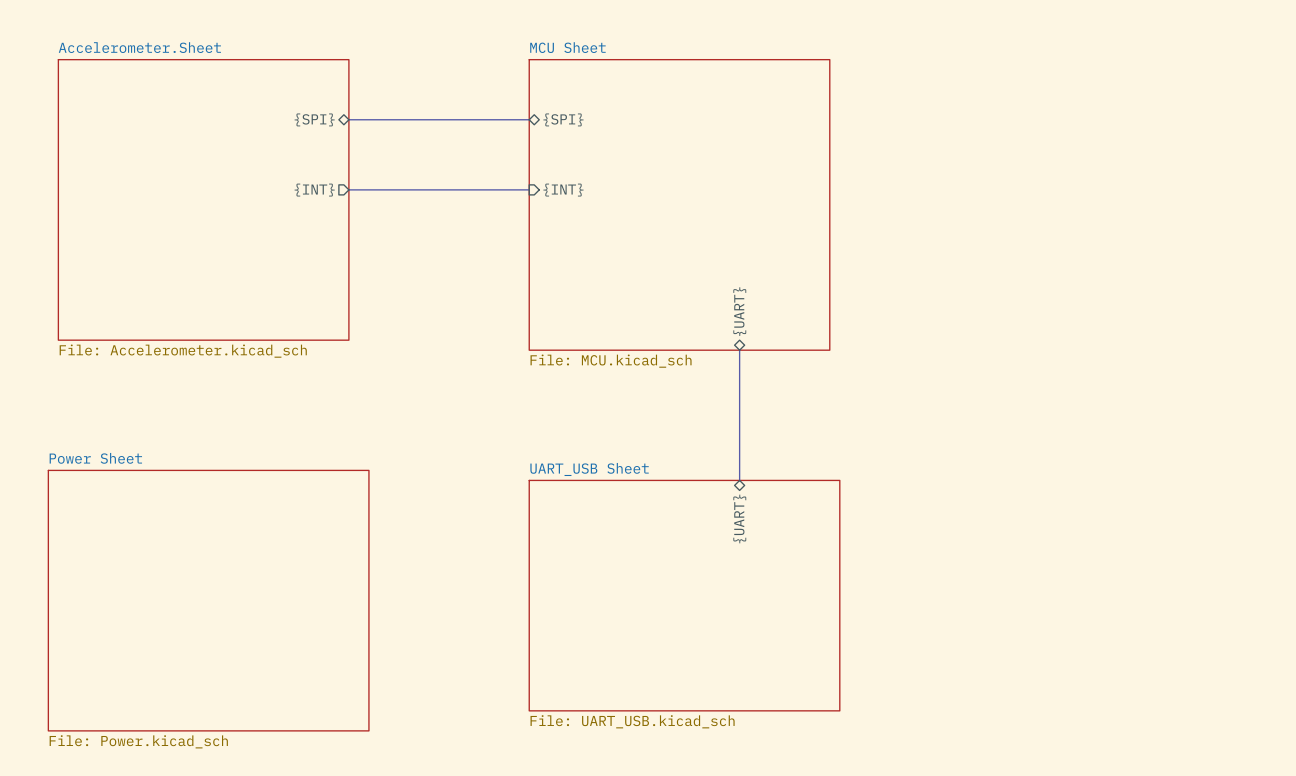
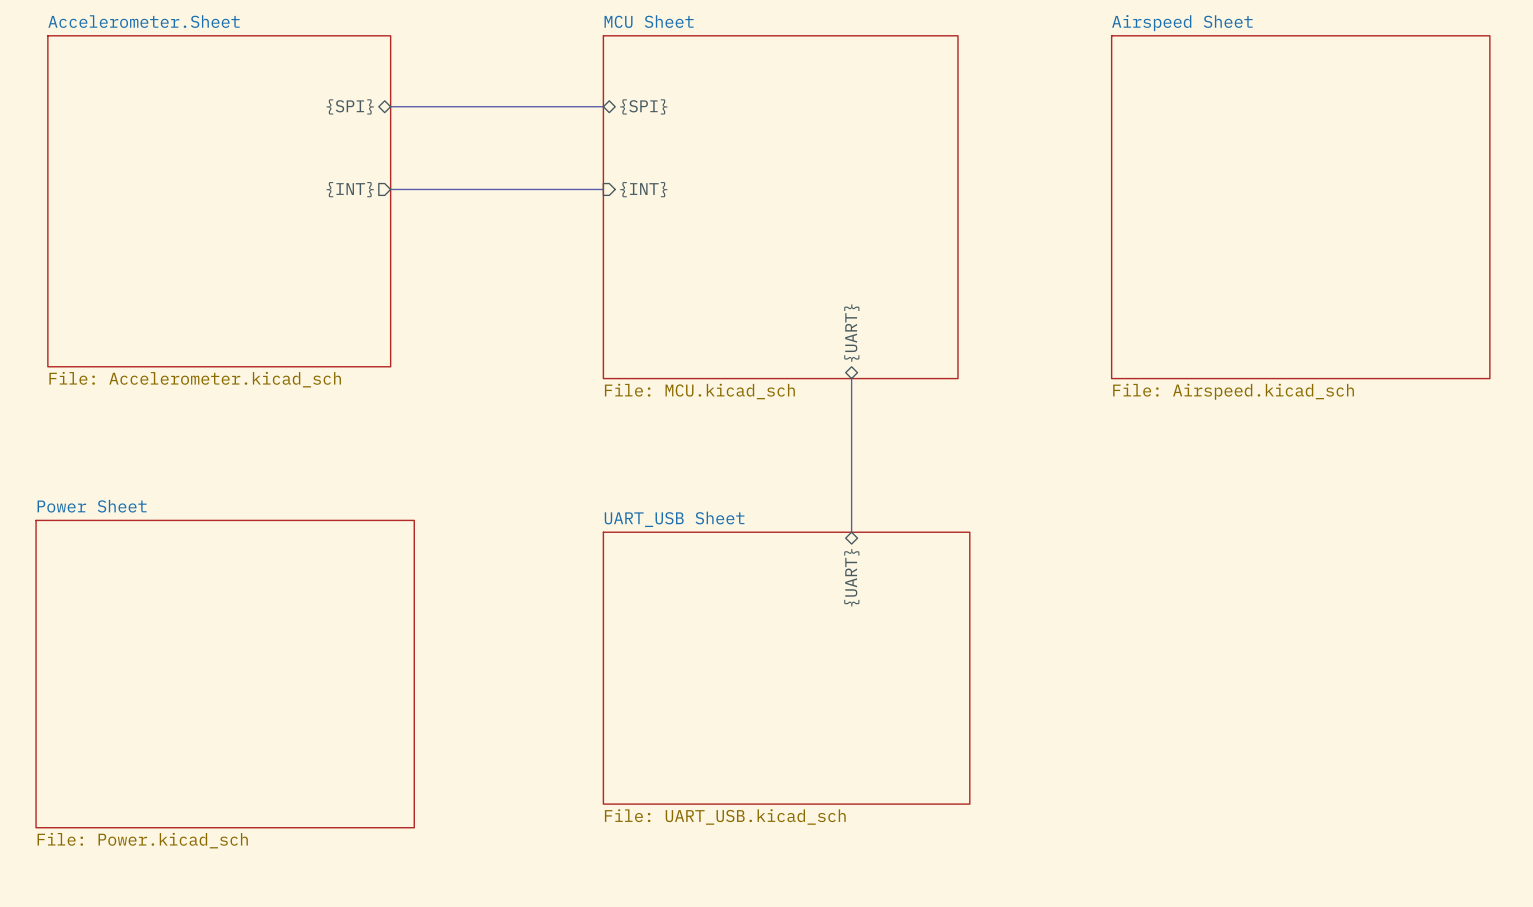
sheet Airspeed Sheet: none -> File: Airspeed.kicad_sch (1300, 207)

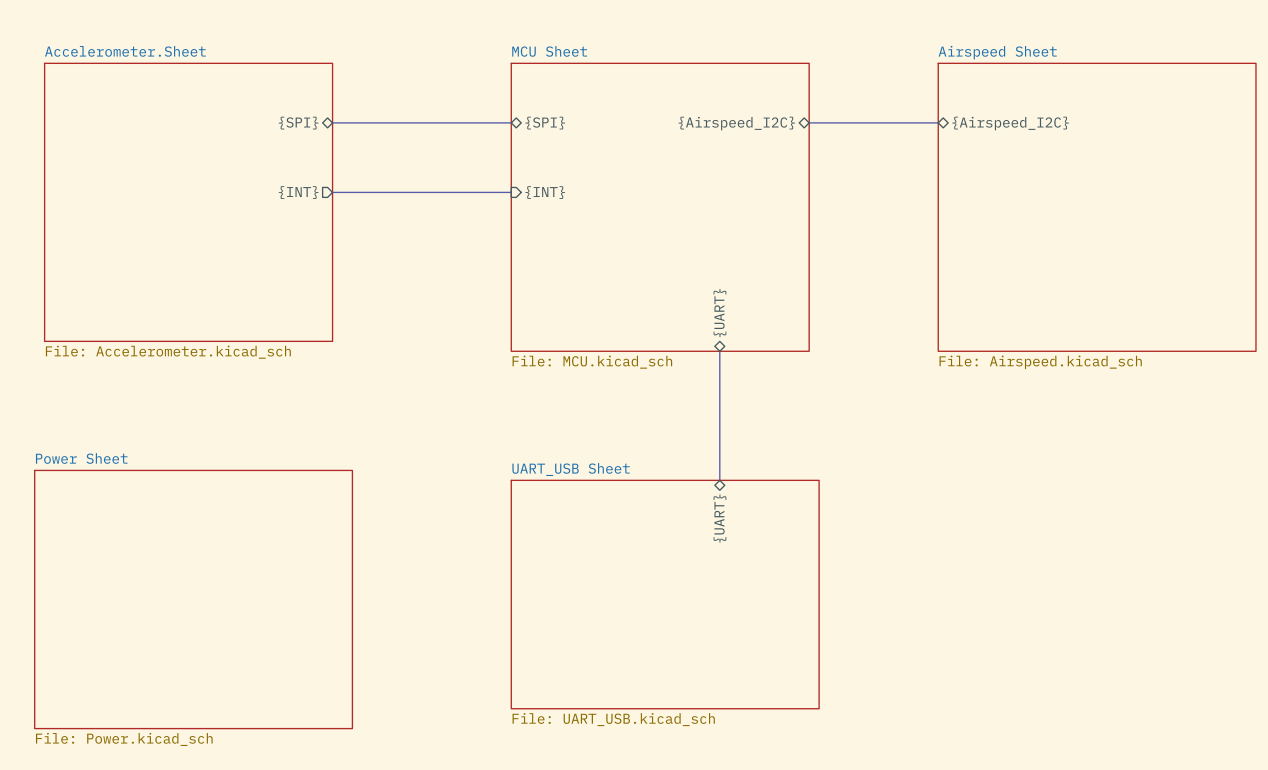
bus: none -> (809, 122) (938, 122)
sheet pin: none -> {Airspeed_I2C} (736, 123)
sheet pin: none -> {Airspeed_I2C} (1010, 123)

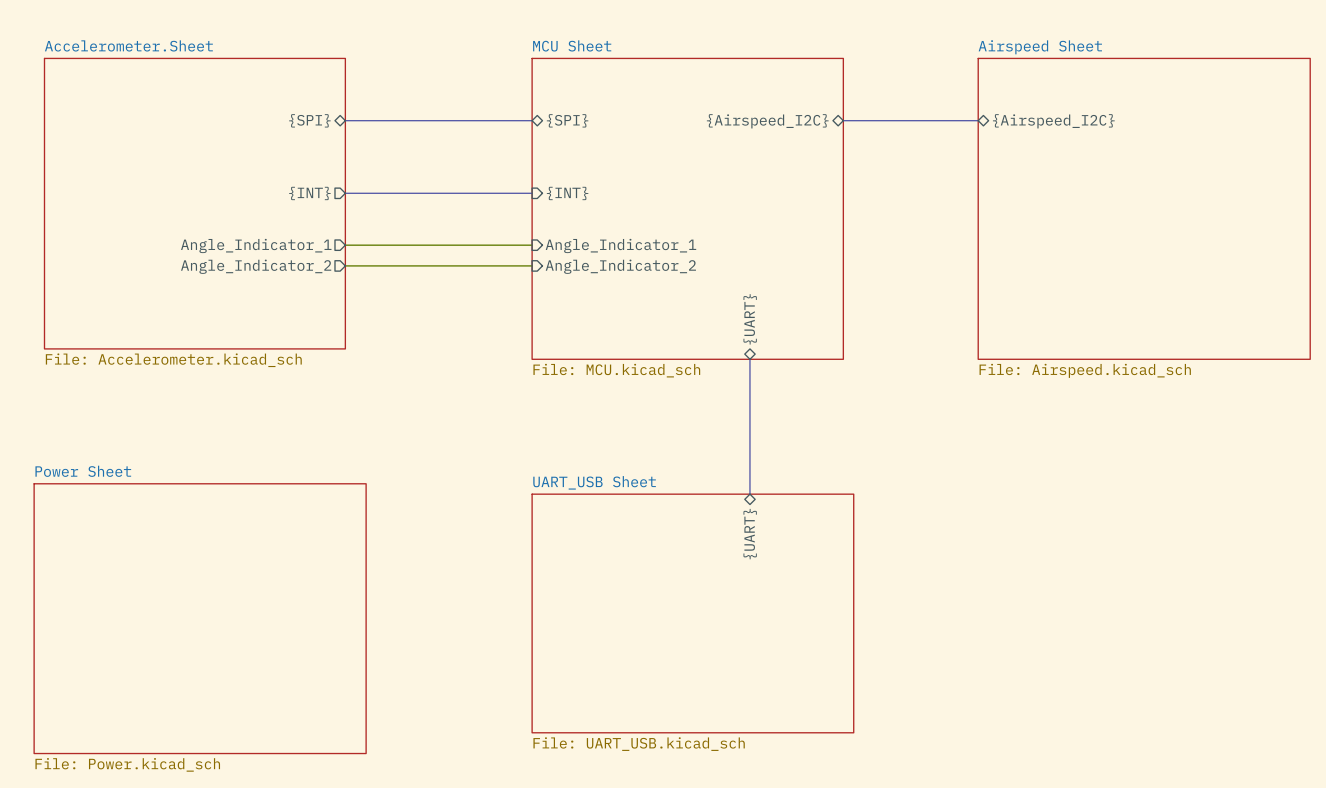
sheet pin: none -> Angle_Indicator_1 (256, 245)
wire: none -> (345, 245) (532, 245)
sheet pin: none -> Angle_Indicator_1 (620, 245)
wire: none -> (345, 265) (532, 265)
sheet pin: none -> Angle_Indicator_2 (256, 266)
sheet pin: none -> Angle_Indicator_2 (620, 266)

